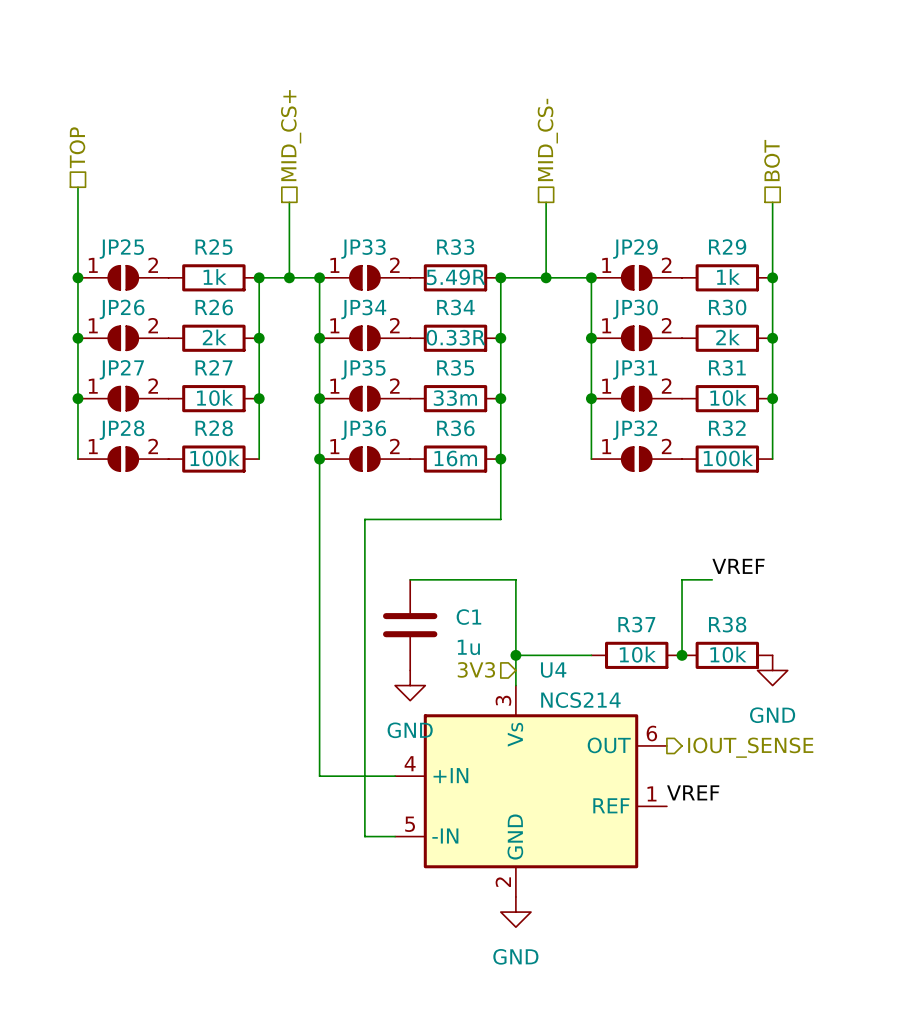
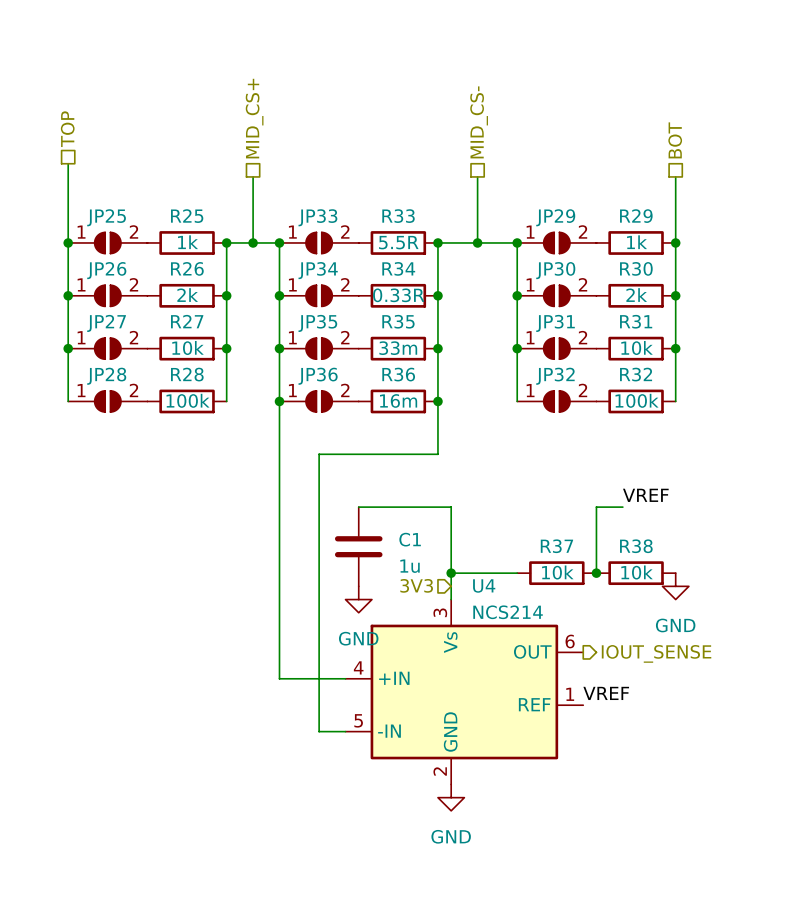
R33 value: 5.49R (456, 277) -> 5.5R (398, 242)

